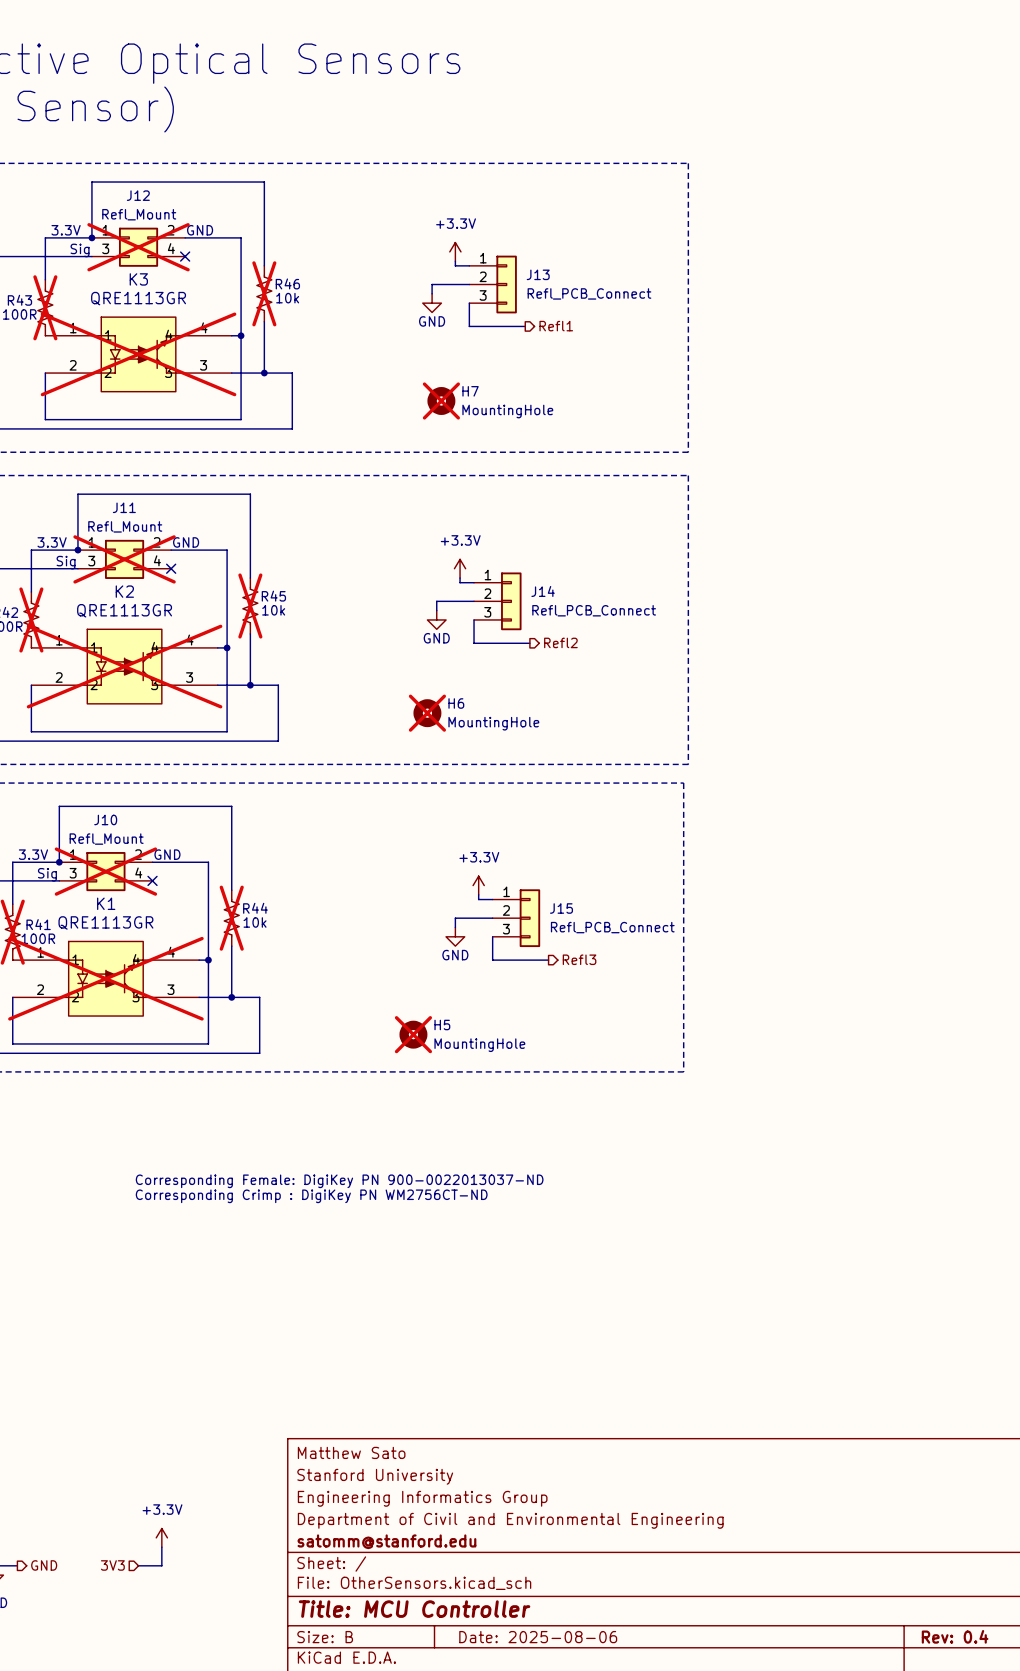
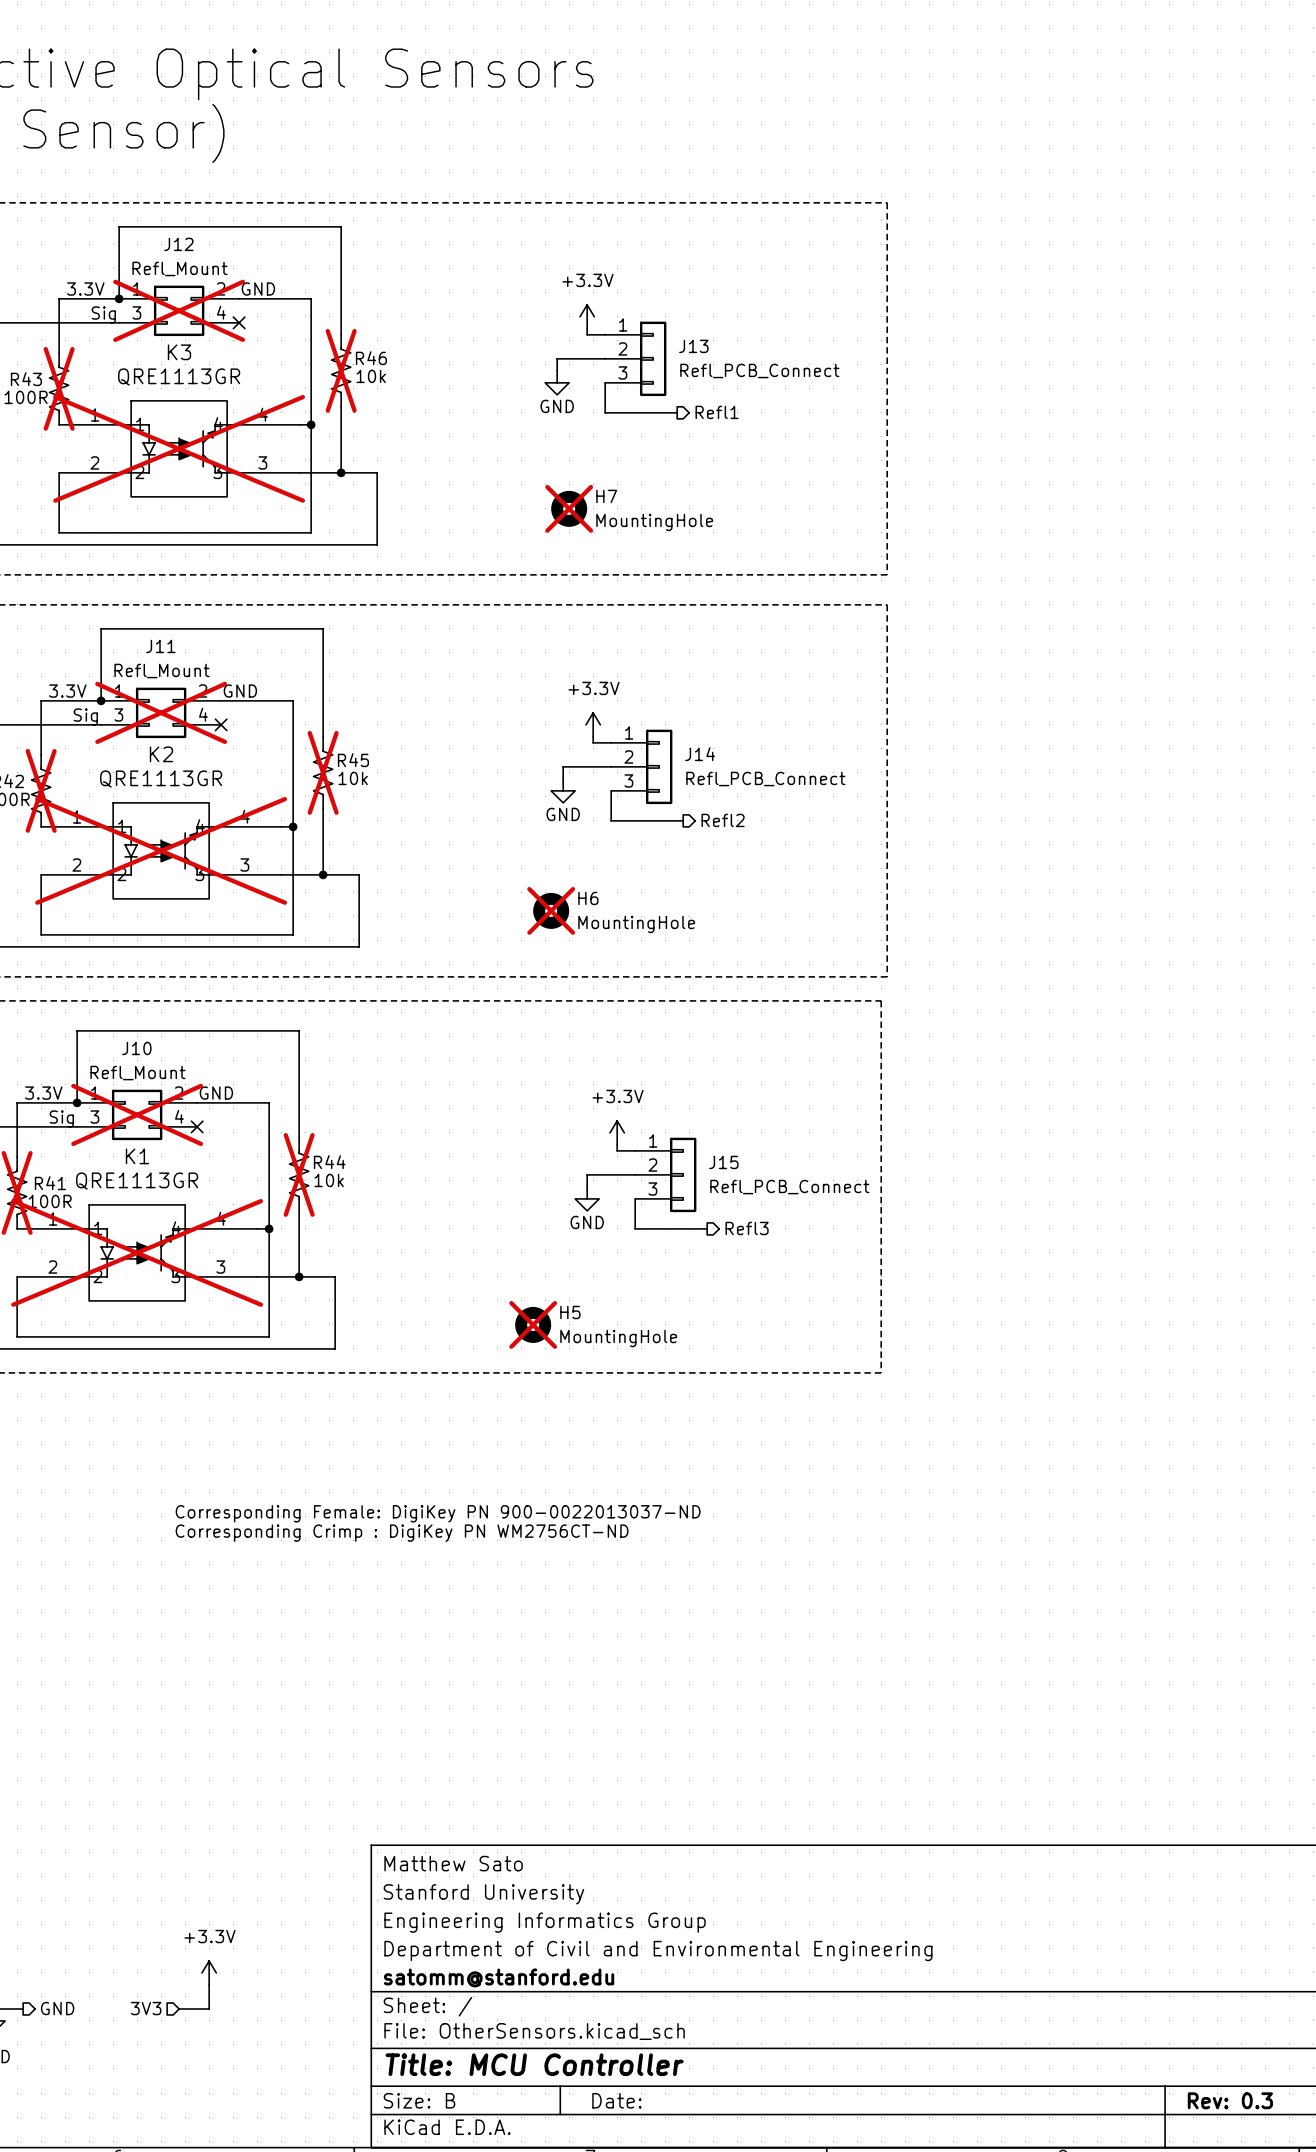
title block: Rev: 0.4 (955, 1636) -> Rev: 0.3 (1230, 2100)
title block: Date: 2025-08-06 (538, 1637) -> Date: (616, 2100)

